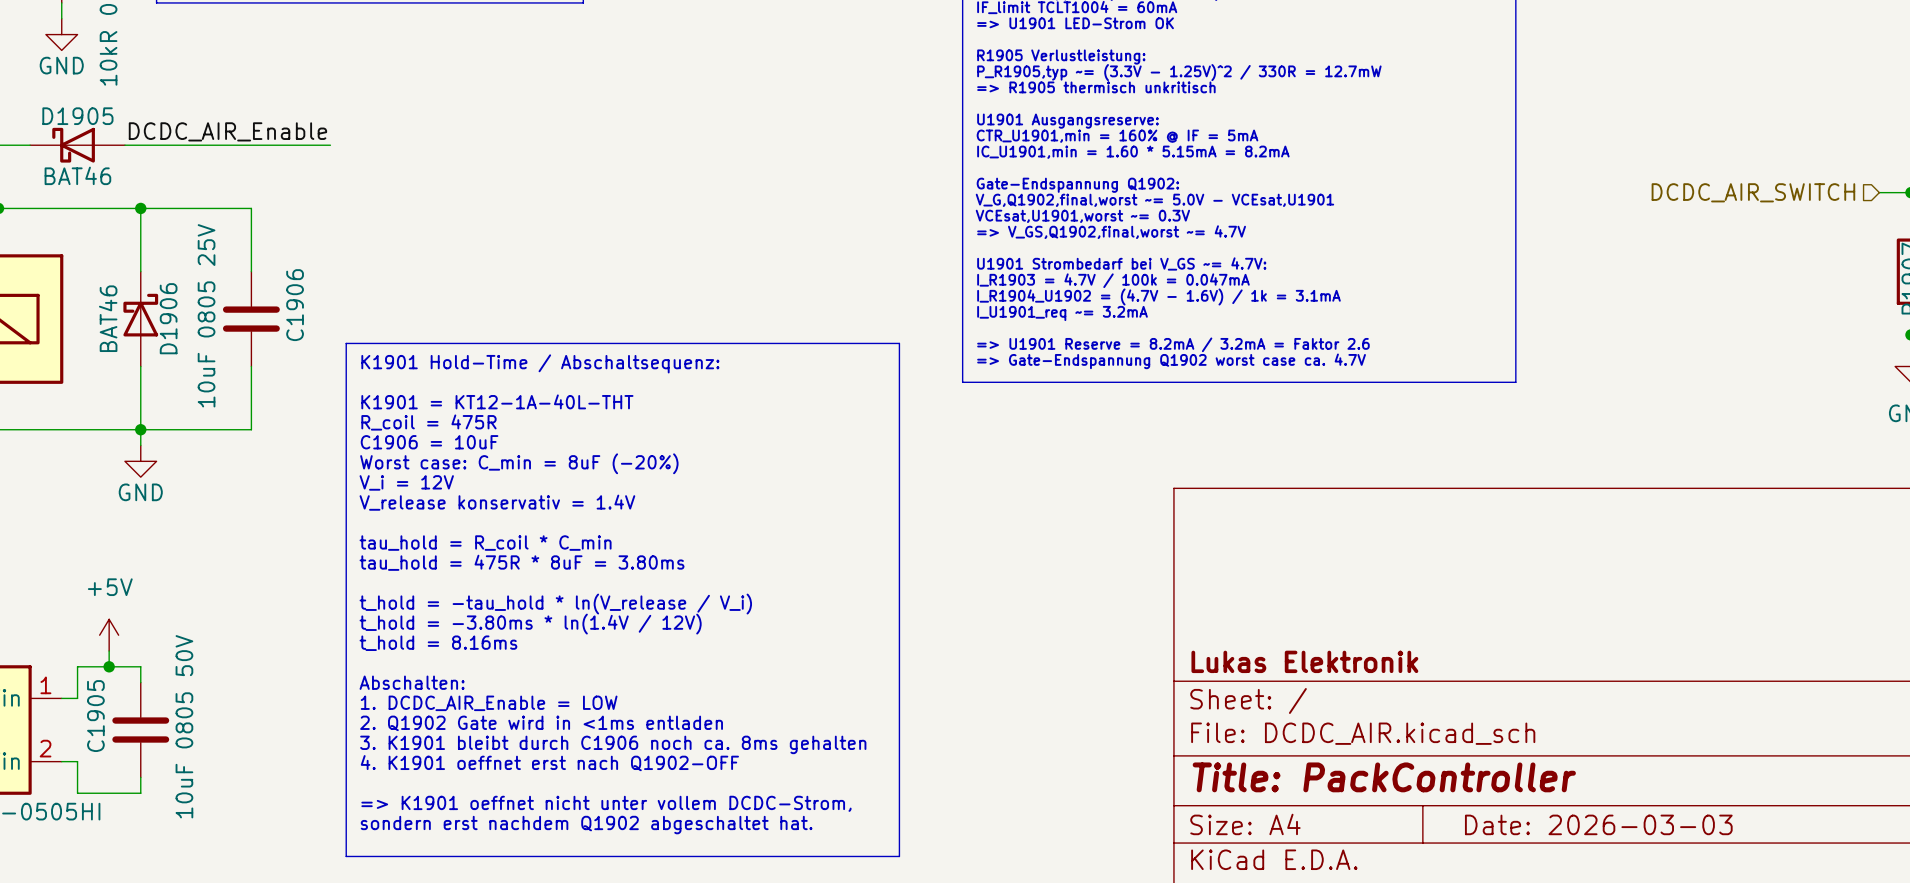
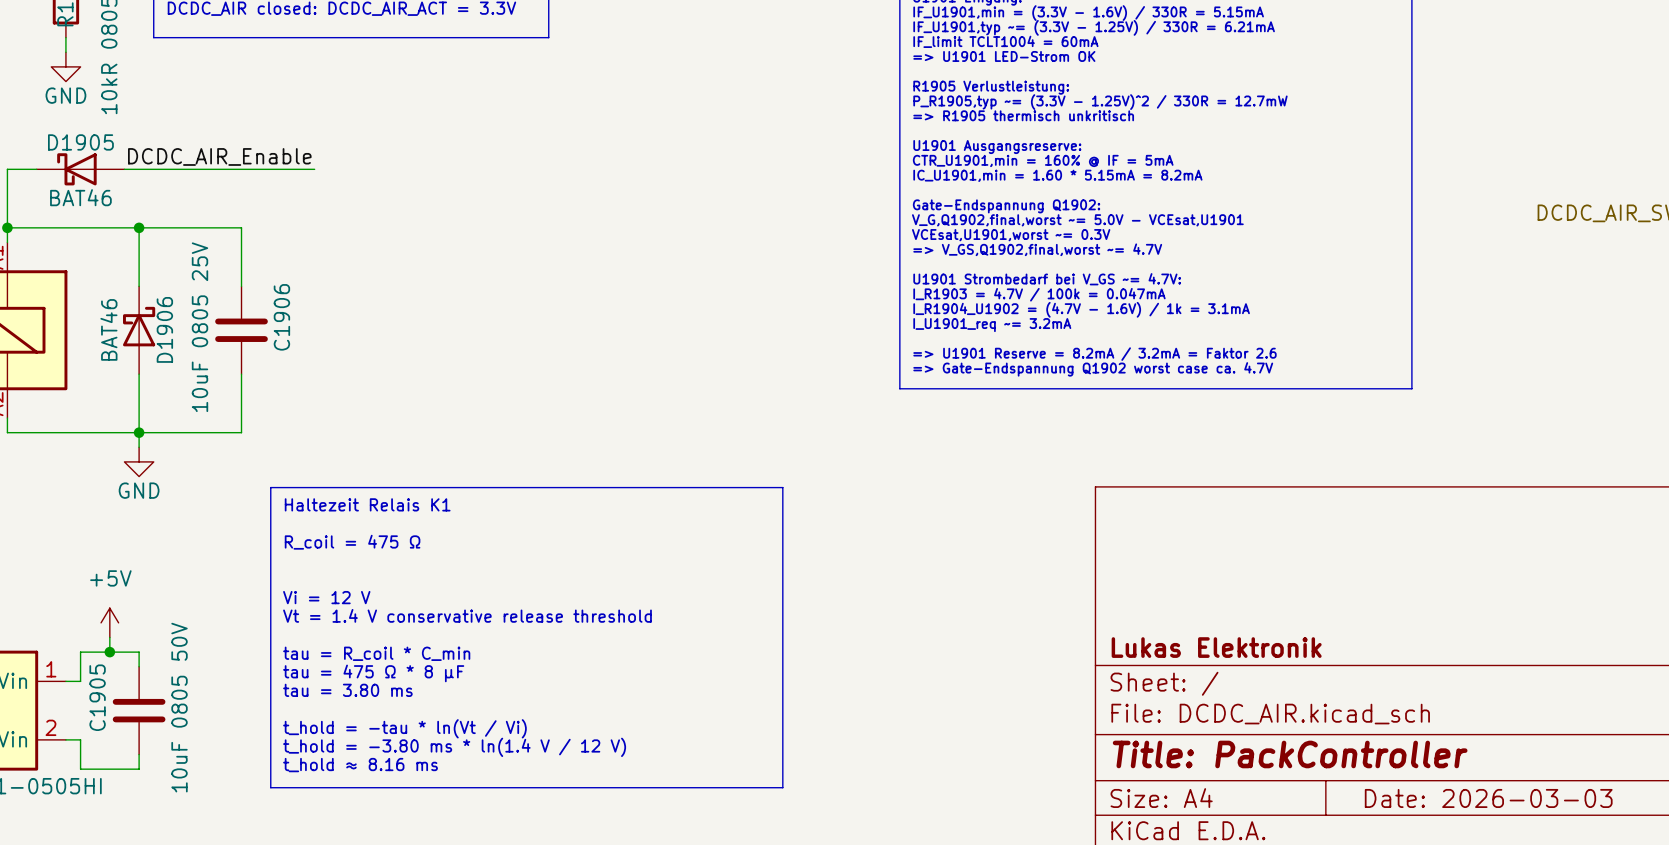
line: (346, 343) (899, 343) (899, 856) (346, 856) (346, 343) -> (270, 487) (270, 787) (782, 787) (782, 487) (270, 487)
text: K1901 Hold-Time / Abschaltsequenz: (540, 363) -> none
text: K1901 = KT12-1A-40L-THT (497, 401) -> none
text: R_coil = 475R (428, 422) -> none
text: C1906 = 10uF (429, 442) -> none
text: Worst case: C_min = 8uF (-20%) (519, 463) -> none
text: V_i = 12V (406, 482) -> none
text: V_release konservativ = 1.4V (497, 502) -> none
text: none -> Haltezeit Relais K1 (367, 504)
text: tau_hold = R_coil * C_min (485, 543) -> none
text: none -> R_coil = 475 Ω (352, 542)
text: tau_hold = 475R * 8uF = 3.80ms (522, 562) -> none
text: t_hold = -tau_hold * ln(V_release / V_i) (555, 604) -> none
text: none -> Vi = 12 V (326, 597)
text: t_hold = -3.80ms * ln(1.4V / 12V) (530, 624) -> none
text: none -> Vt = 1.4 V conservative release threshold (467, 615)
text: t_hold = 8.16ms (438, 643) -> none
text: none -> tau = R_coil * C_min (376, 653)
text: Abschalten: (412, 682) -> none
text: none -> tau = 475 Ω * 8 µF (373, 673)
text: 1. DCDC_AIR_Enable = LOW (489, 703) -> none
text: none -> tau = 3.80 ms (347, 690)
text: 2. Q1902 Gate wird in <1ms entladen (541, 723) -> none
text: 3. K1901 bleibt durch C1906 noch ca. 8ms gehalten (613, 744) -> none
text: none -> t_hold = -tau * ln(Vt / Vi) (404, 728)
text: 4. K1901 oeffnet erst nach Q1902-OFF (549, 763) -> none
text: none -> t_hold = -3.80 ms * ln(1.4 V / 12 V) (454, 747)
text: none -> t_hold ≈ 8.16 ms (360, 765)
text: => K1901 oeffnet nicht unter vollem DCDC-Strom, (606, 803) -> none
text: sondern erst nachdem Q1902 abgeschaltet hat. (586, 825) -> none

